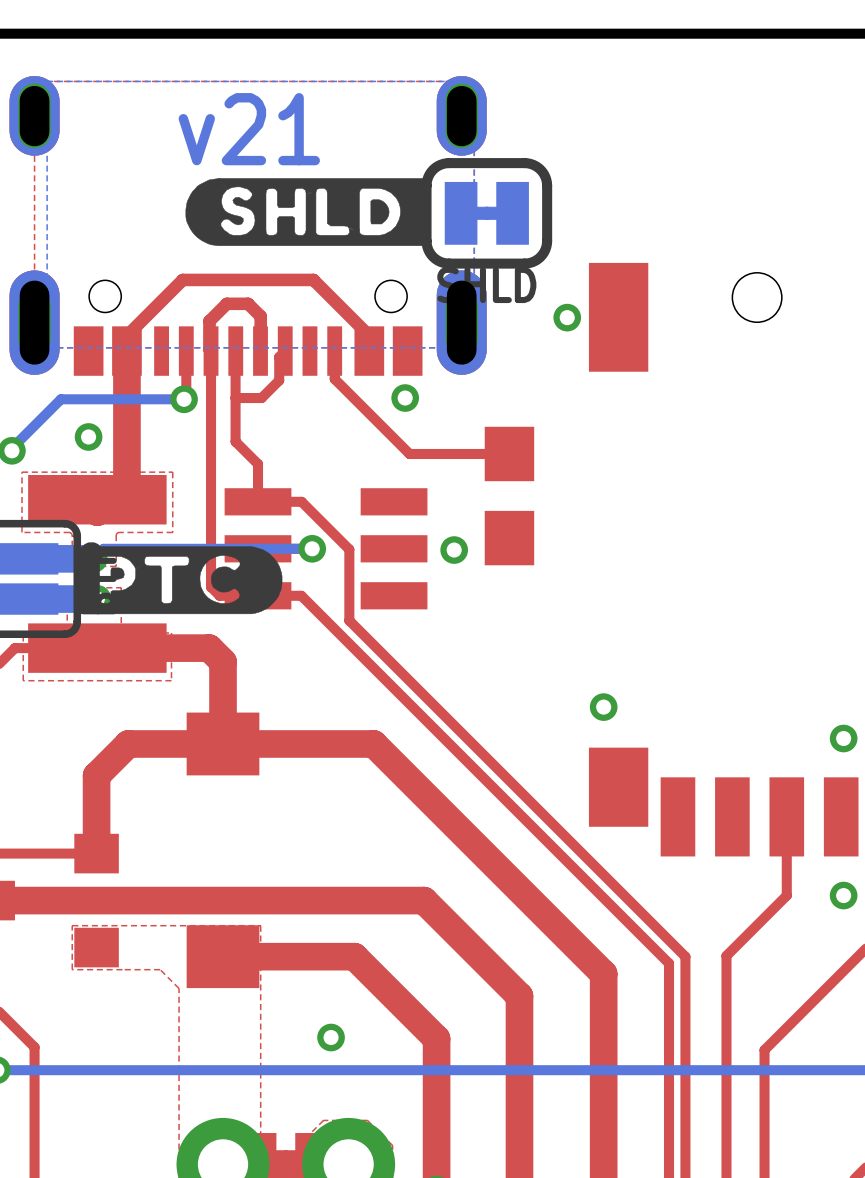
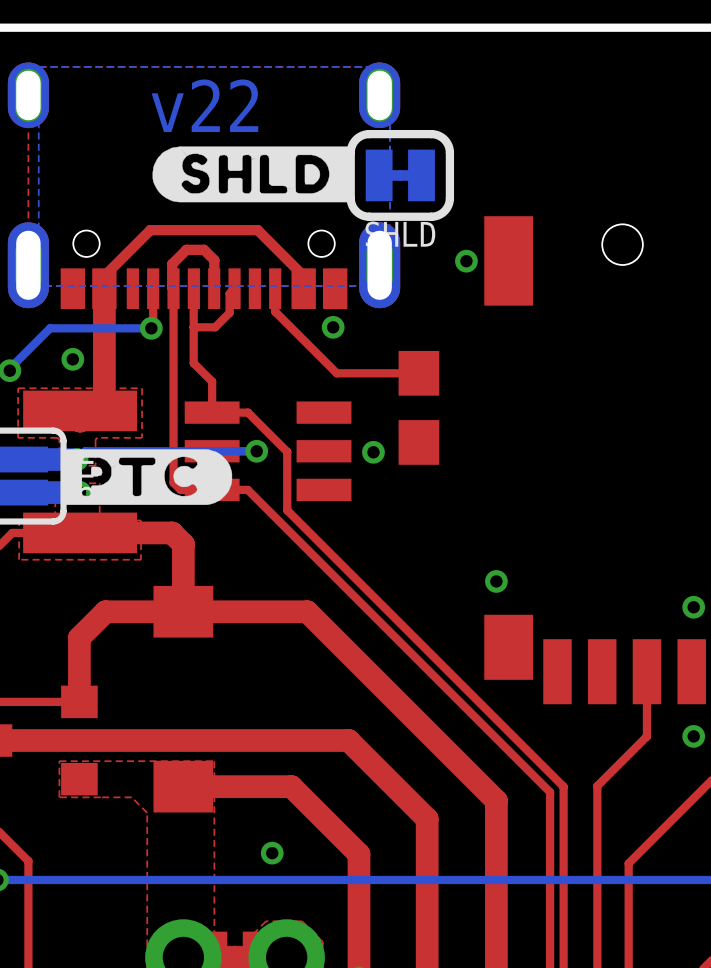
text: v21 (249, 129) -> v22 (204, 105)

